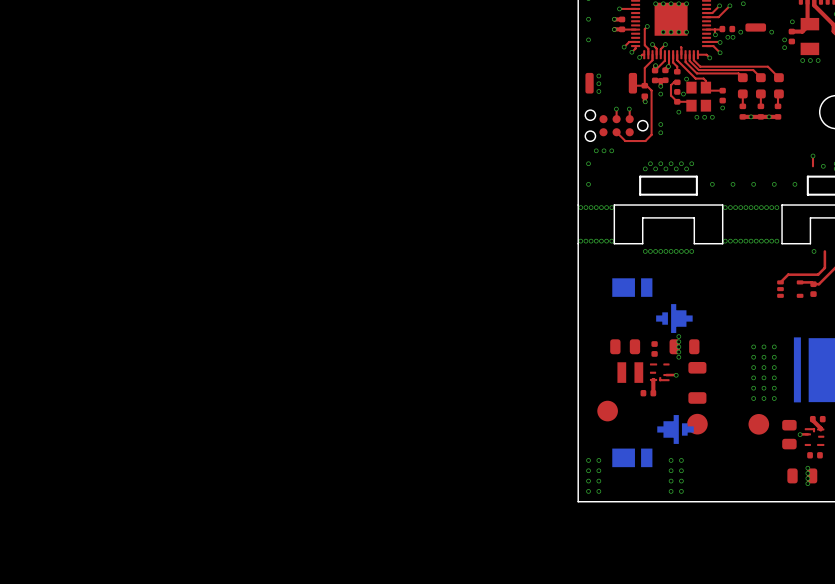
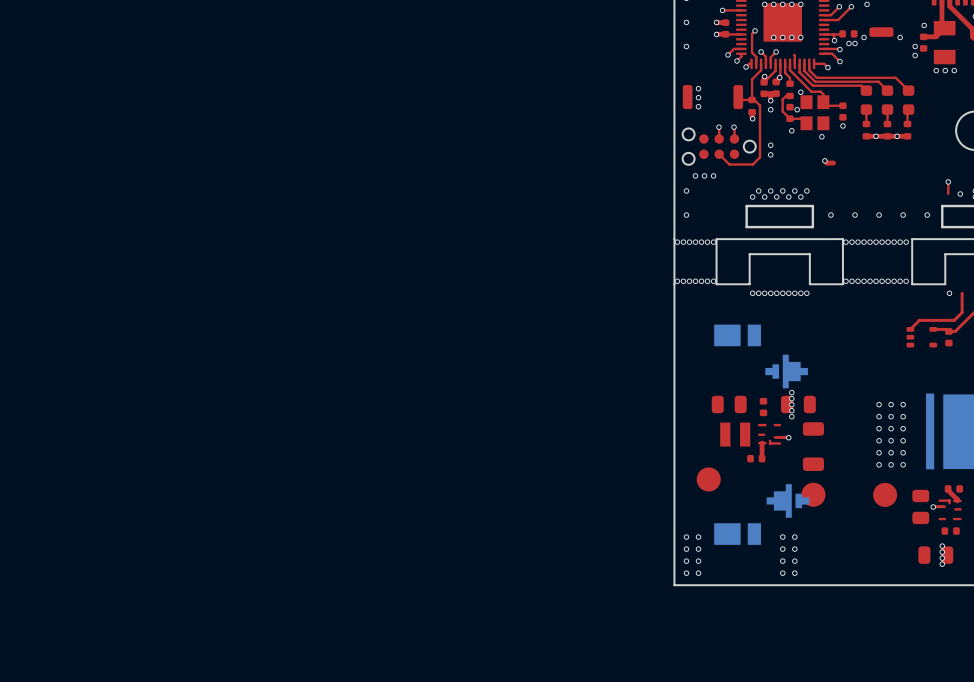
via: (696, 117) -> none
via: (712, 117) -> none
top track: none -> (824, 160) (827, 163) (833, 163)
via: none -> (824, 160)

